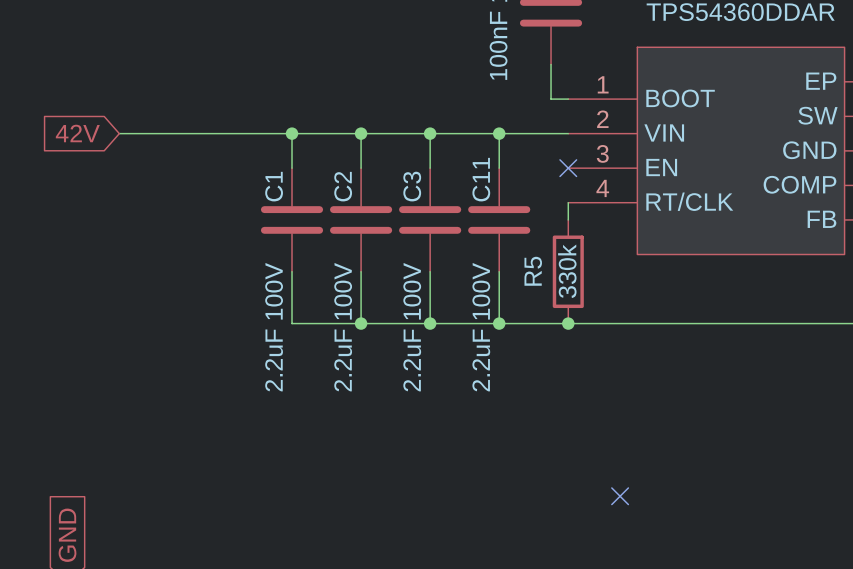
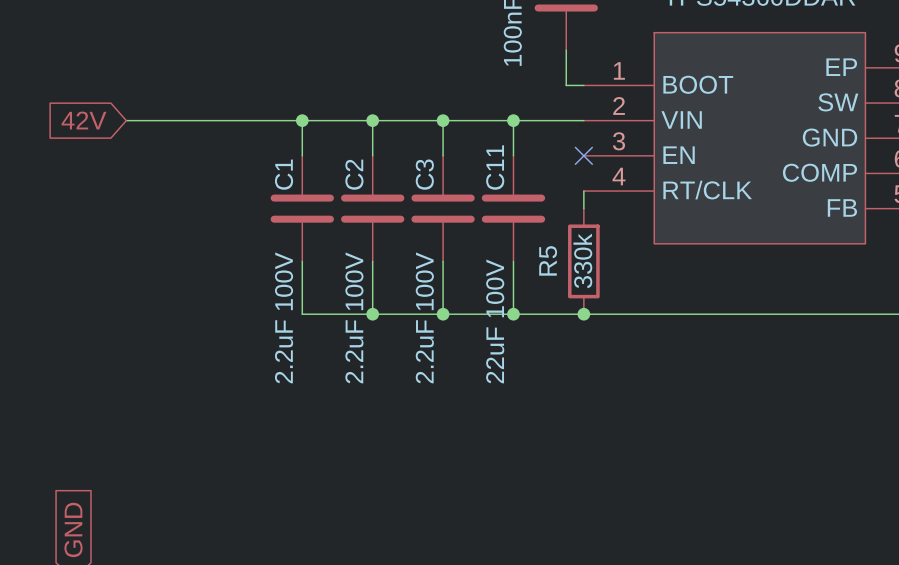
C11 value: 2.2uF 100V (481, 327) -> 22uF 100V (495, 321)
no-connect mark: (620, 496) -> none

